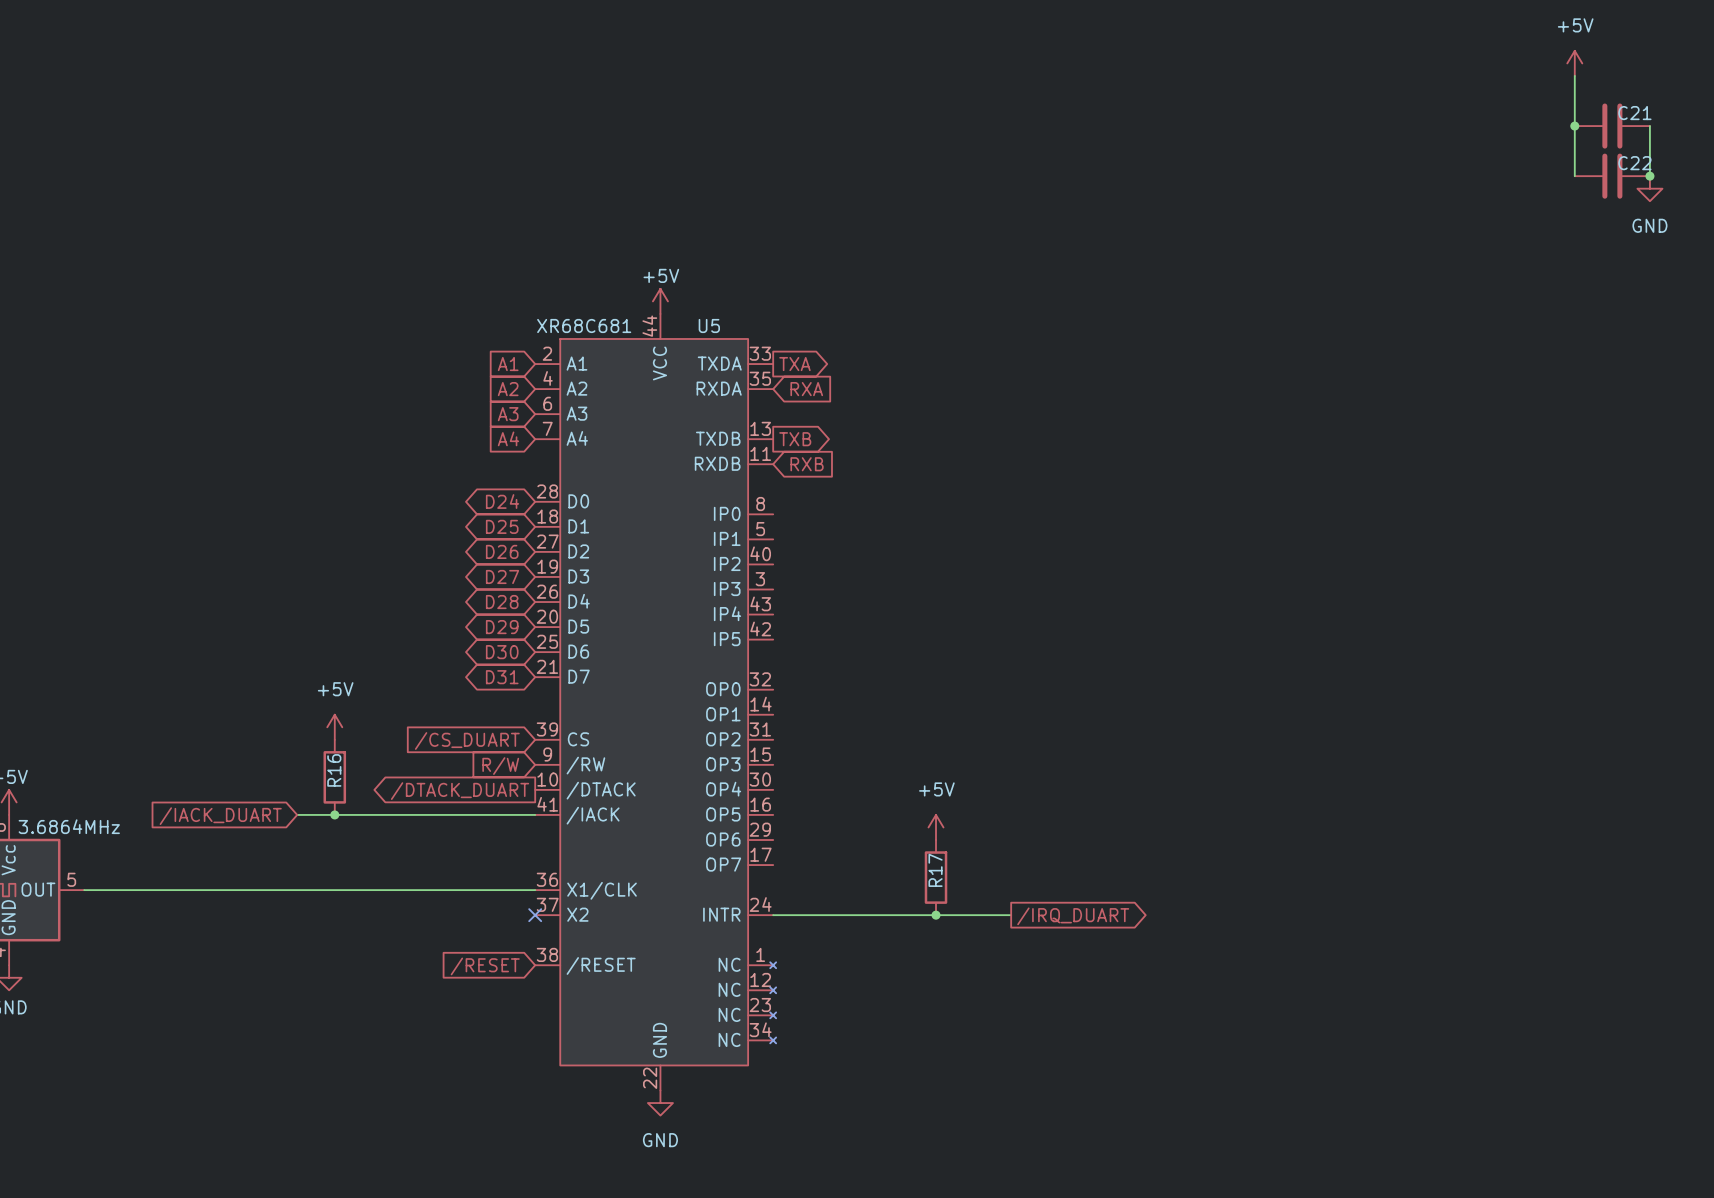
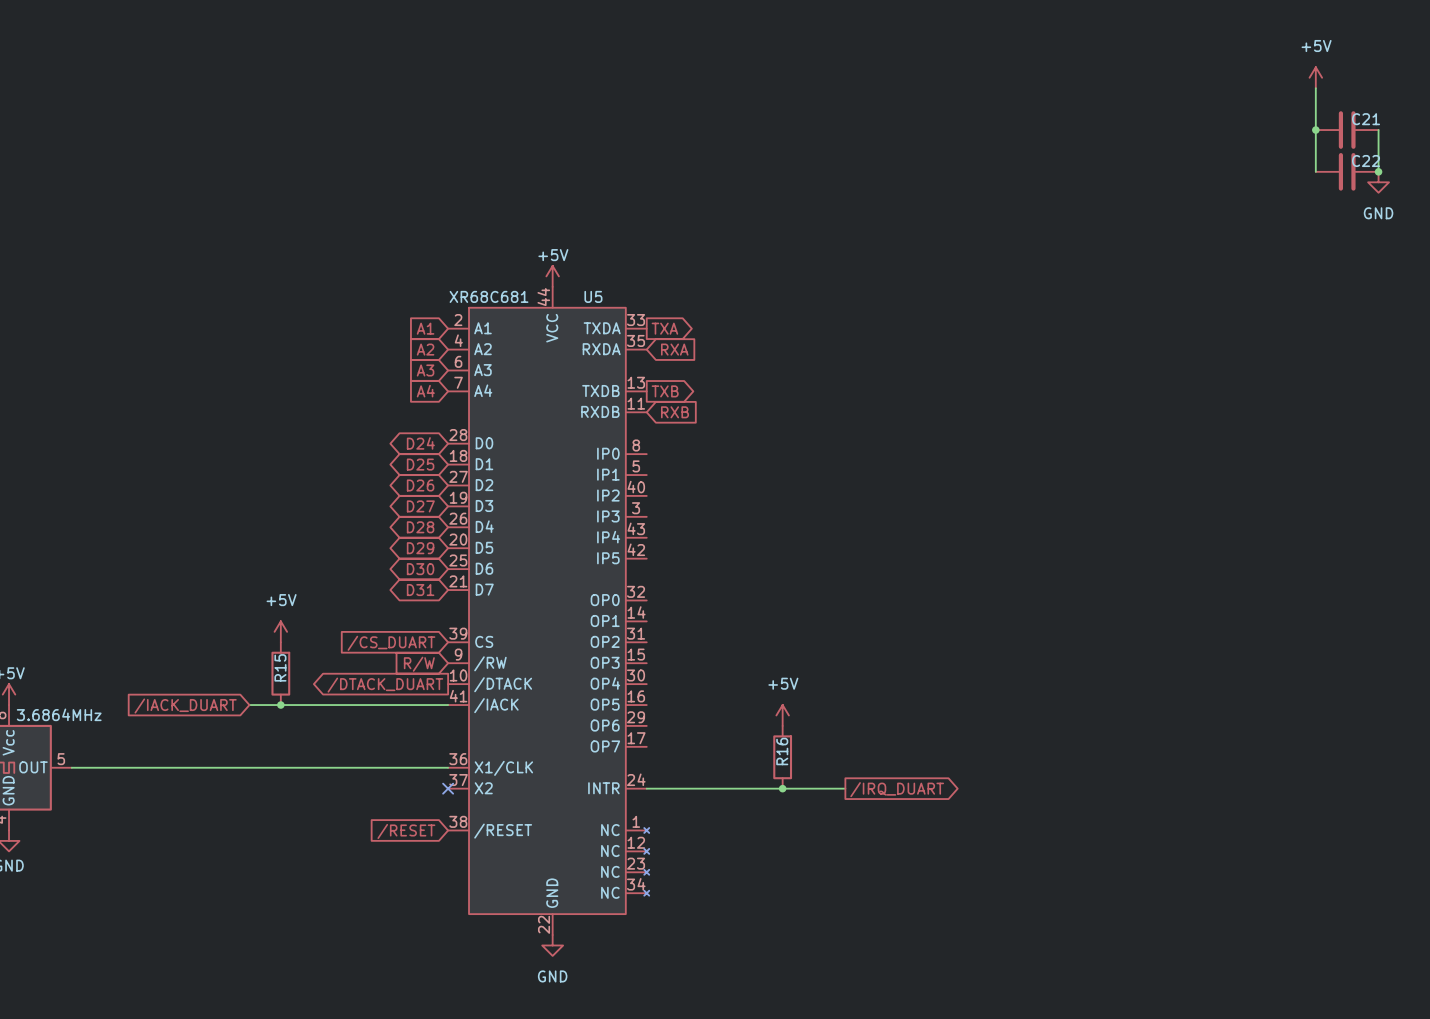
R16 name: R16 (334, 770) -> R15 (280, 667)
R17 name: R17 (935, 870) -> R16 (782, 751)

